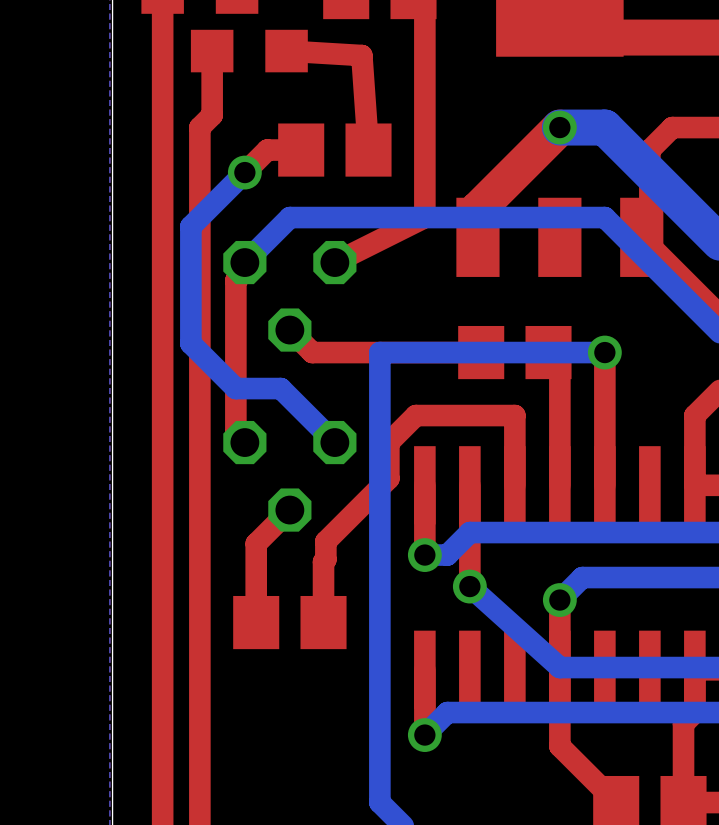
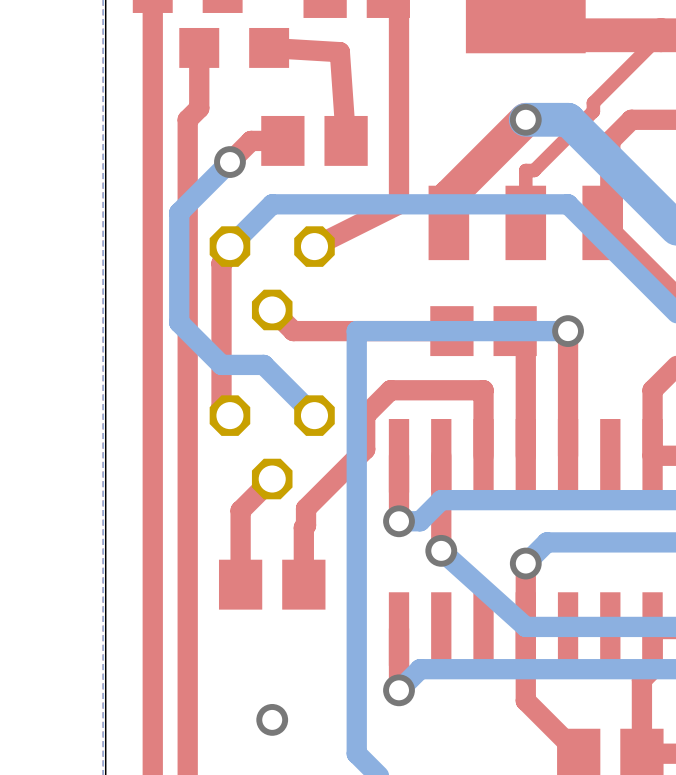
top track: none -> (661, 35) (593, 102) (593, 111) (534, 170) (525, 170) (525, 222)
via: none -> (272, 719)

